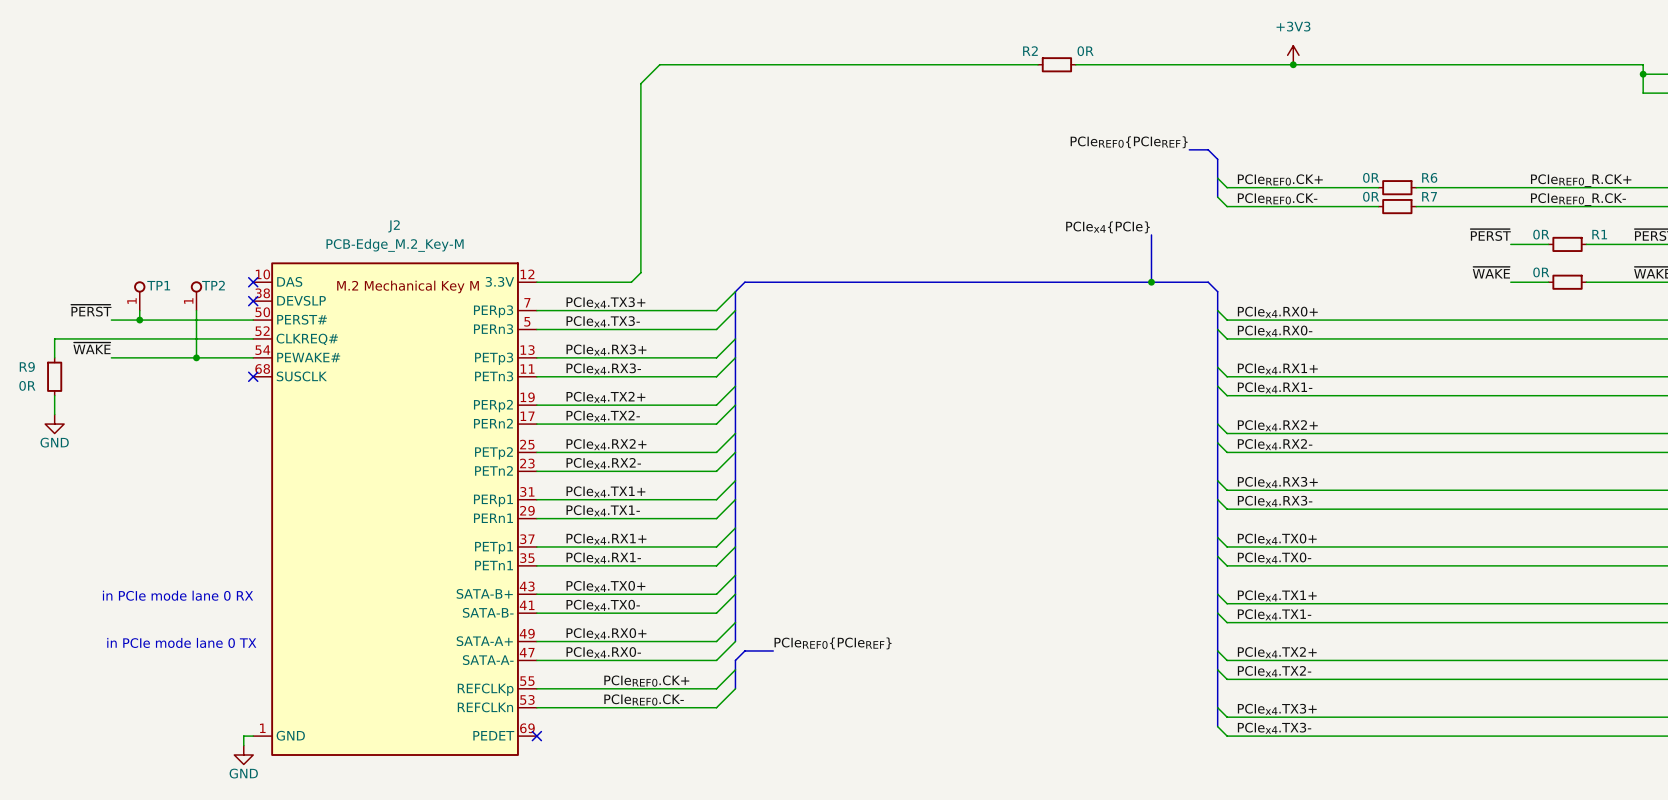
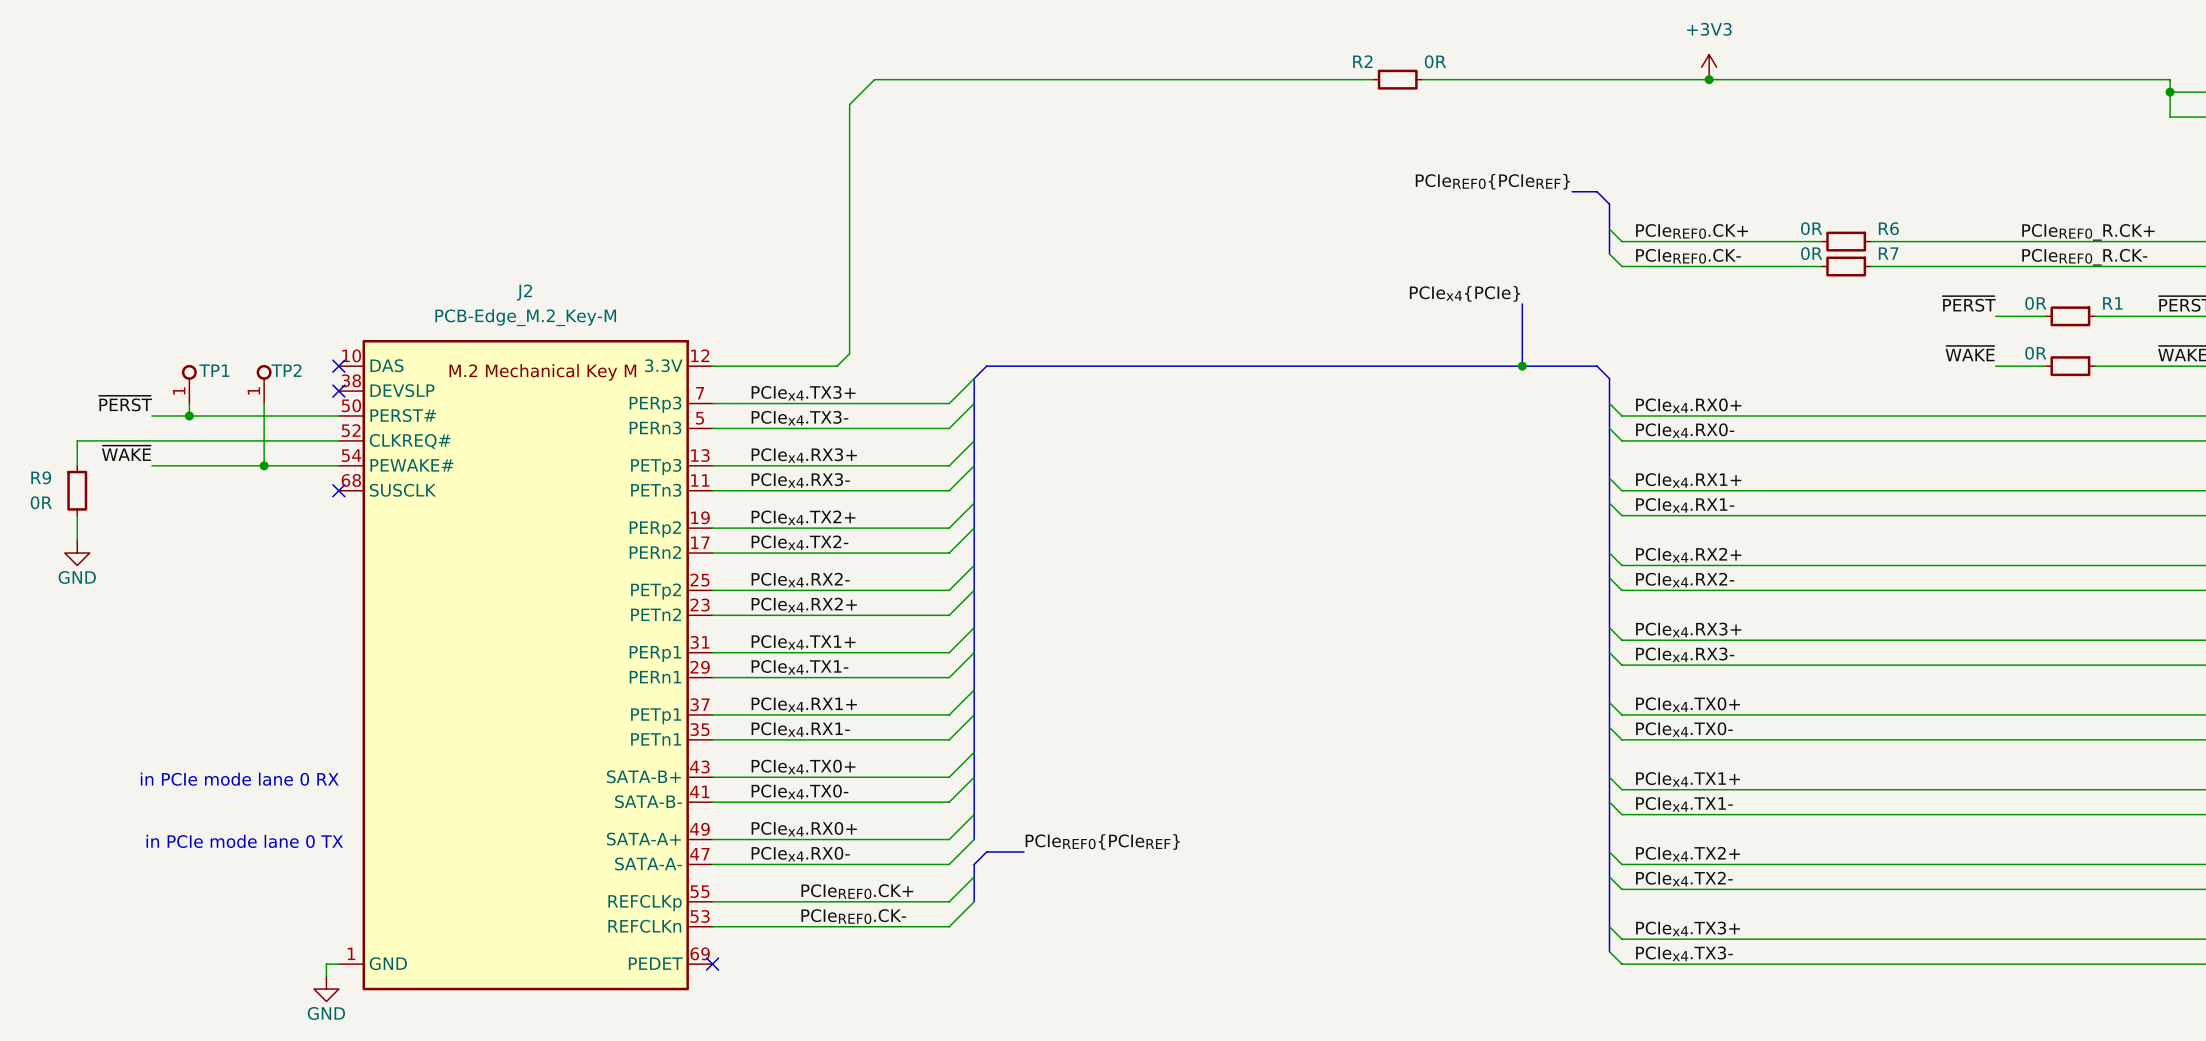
label: PCIex4.RX2+ (606, 444) -> PCIex4.RX2- (800, 580)
label: PCIex4.RX2- (603, 463) -> PCIex4.RX2+ (804, 605)

